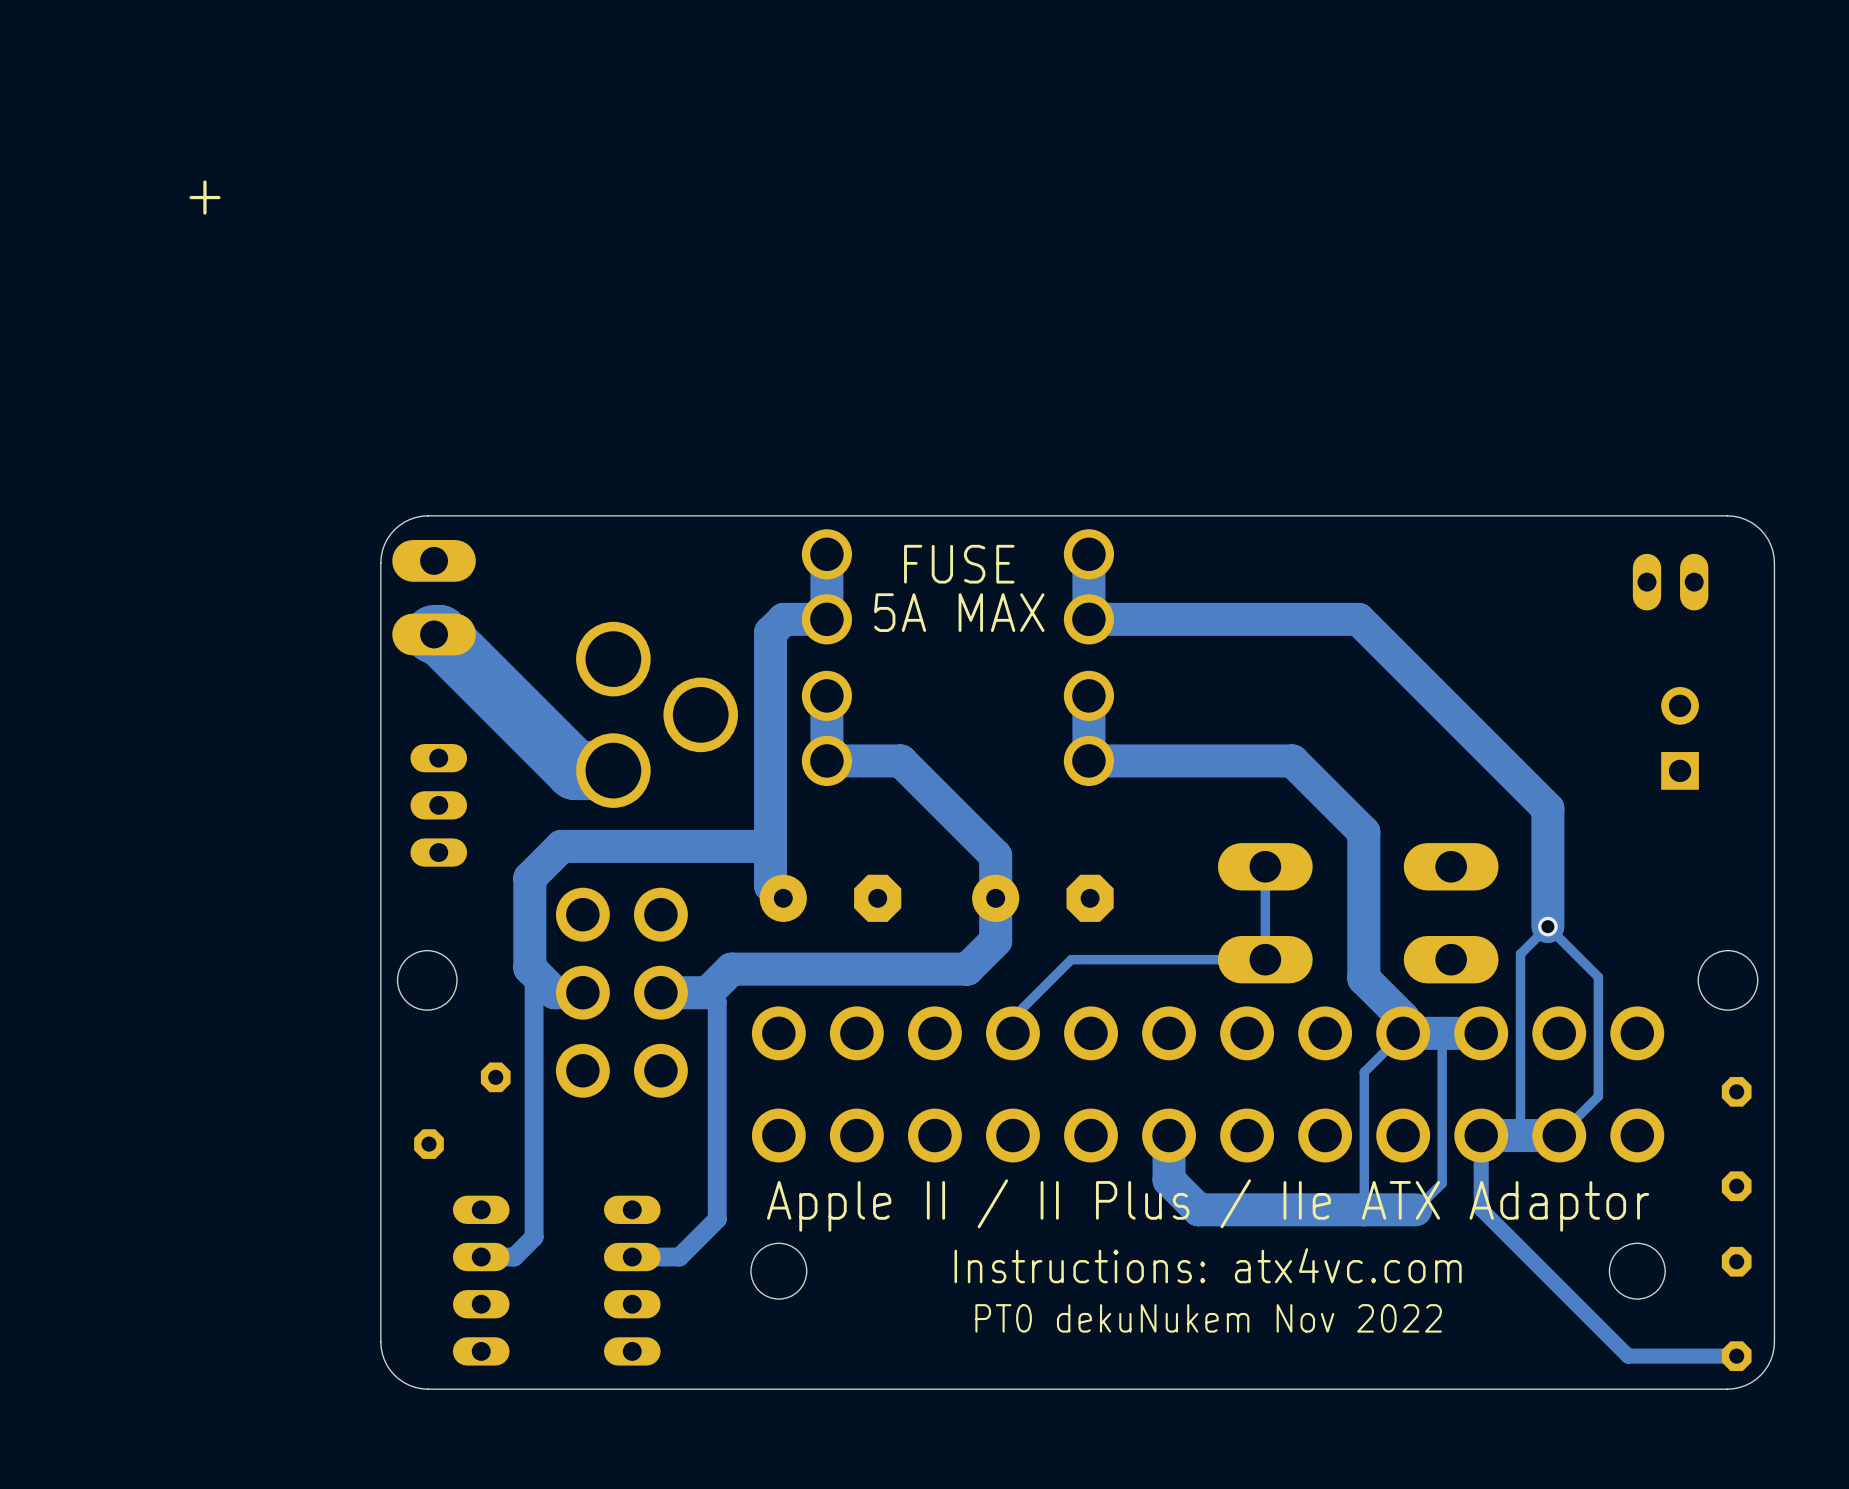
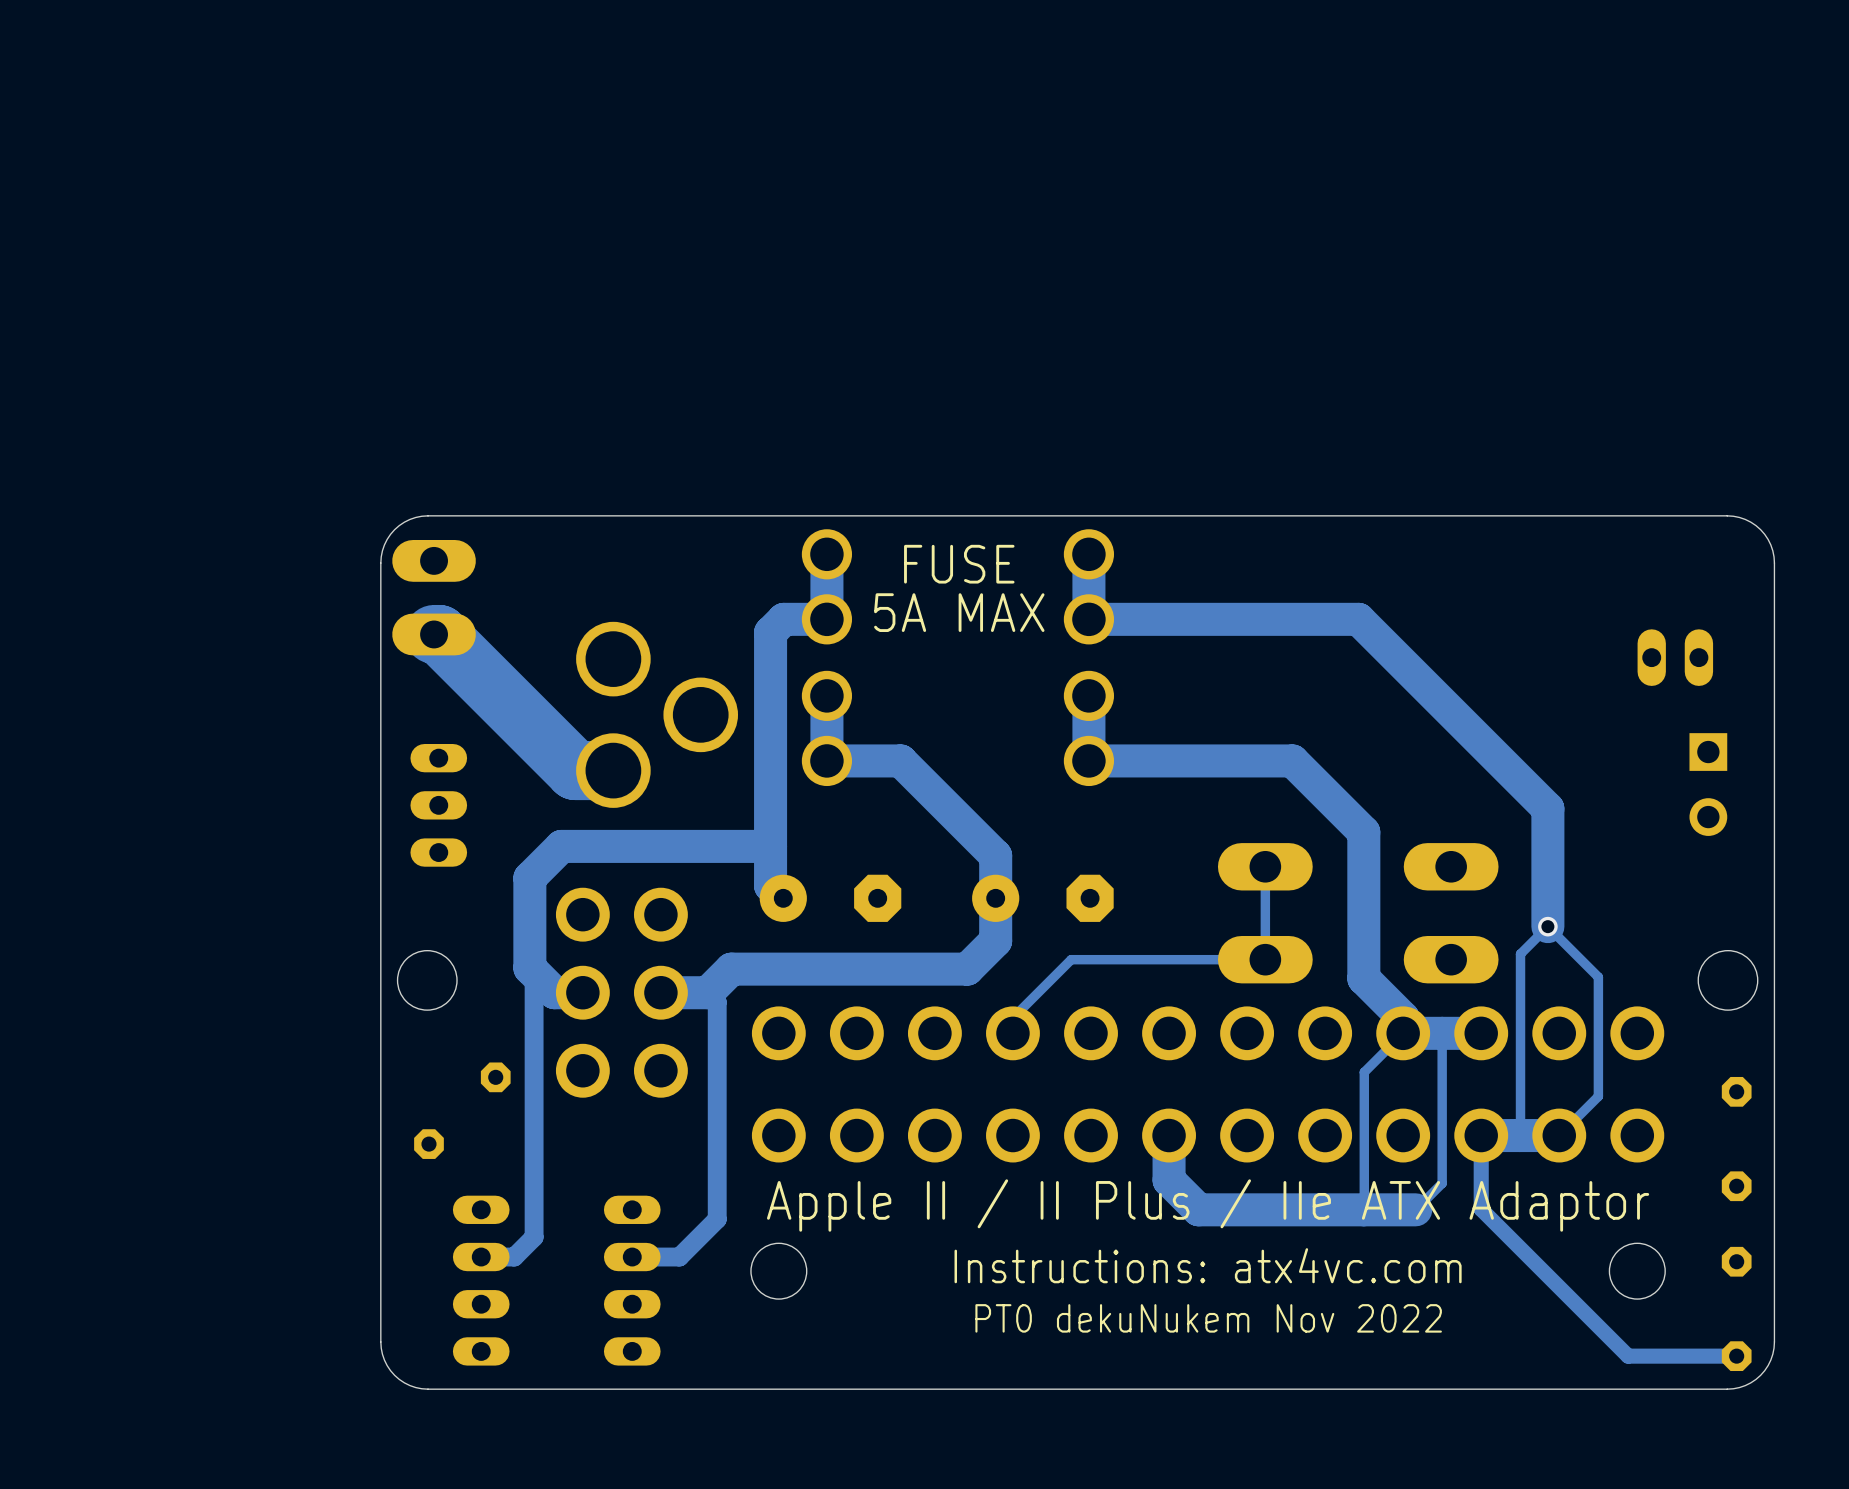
text: + (204, 197) -> none
part position: (1670, 582) -> (1675, 657)
part rotation: 0° (1680, 738) -> 180° (1708, 784)

